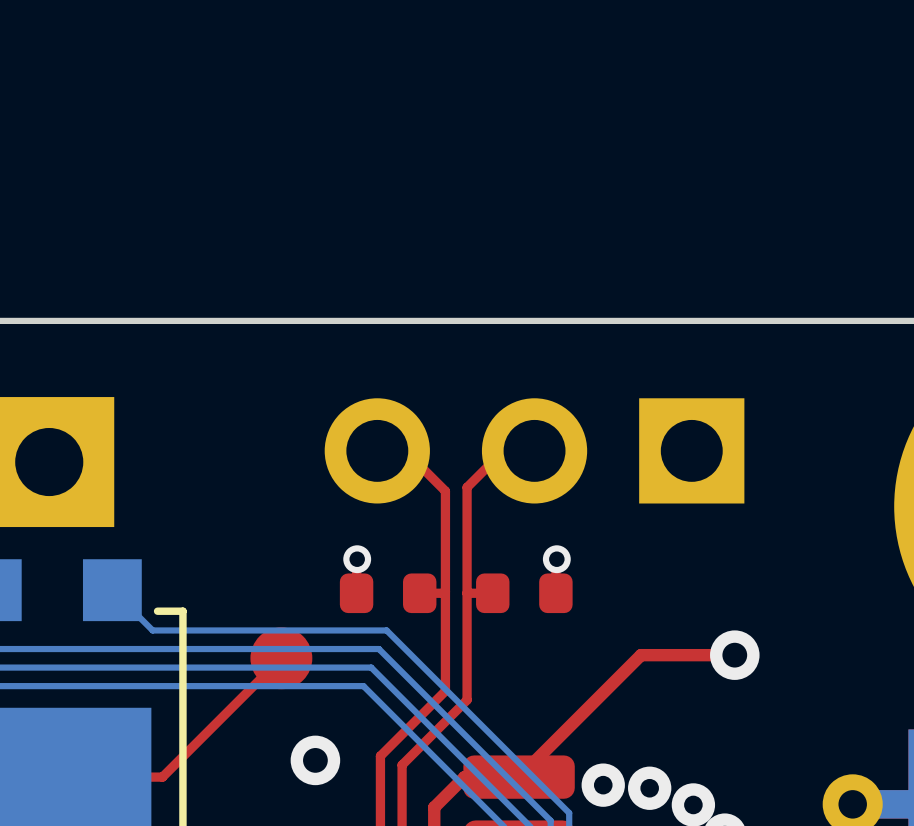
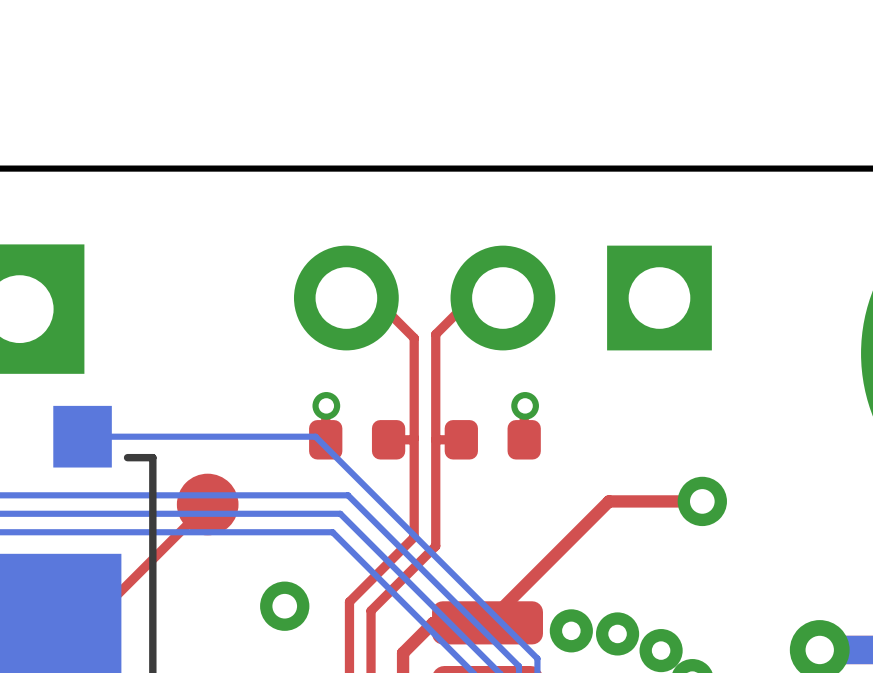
bottom track: (112, 590) (152, 630) (386, 630) -> (82, 436) (315, 436) (355, 476)
top track: (281, 658) (162, 777) (119, 777) -> (207, 504) (89, 622)
part position: (281, 658) -> (207, 504)

